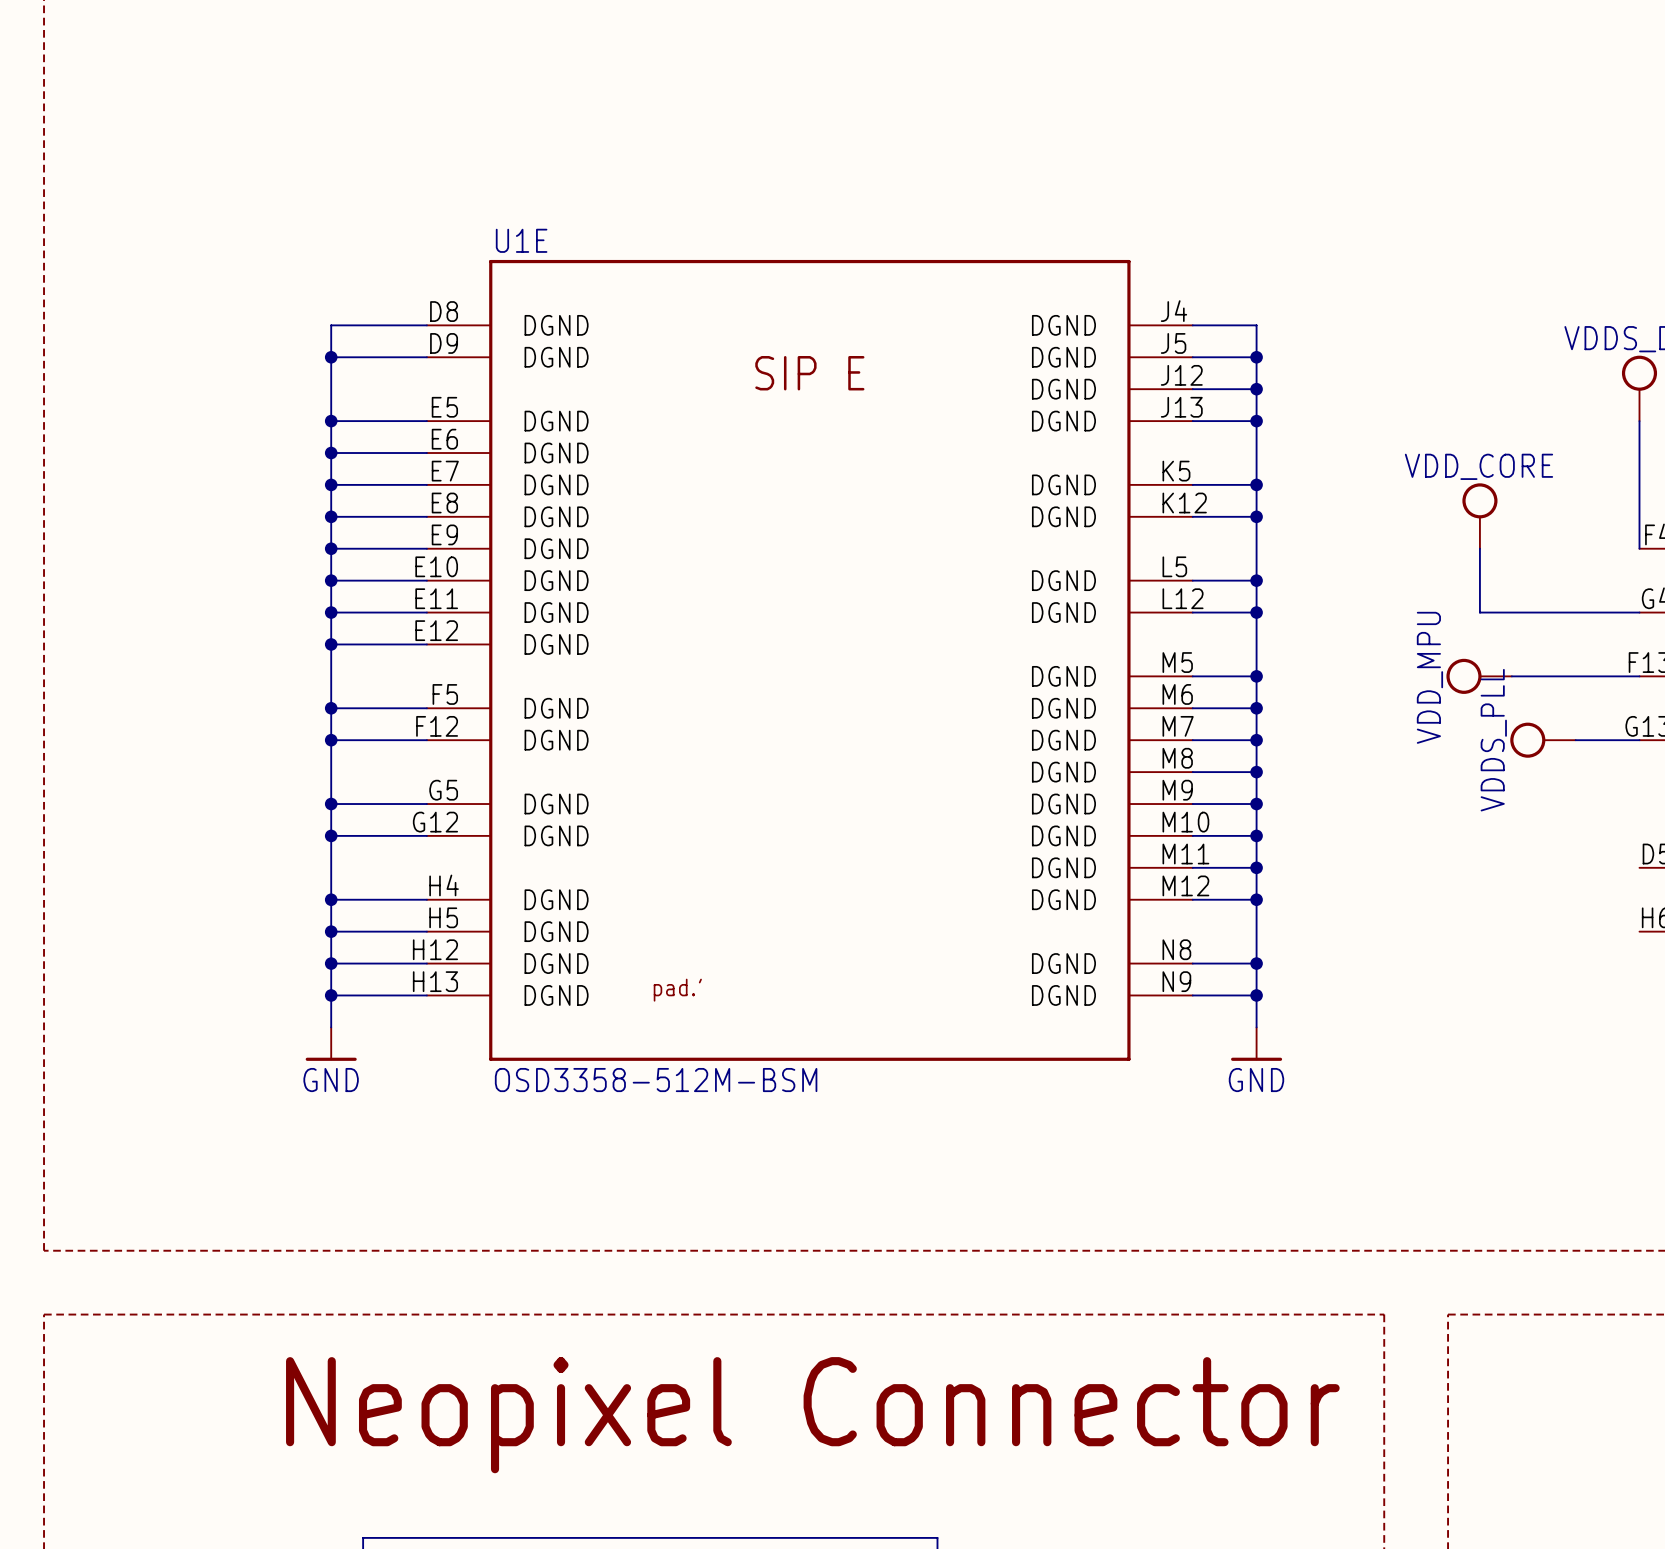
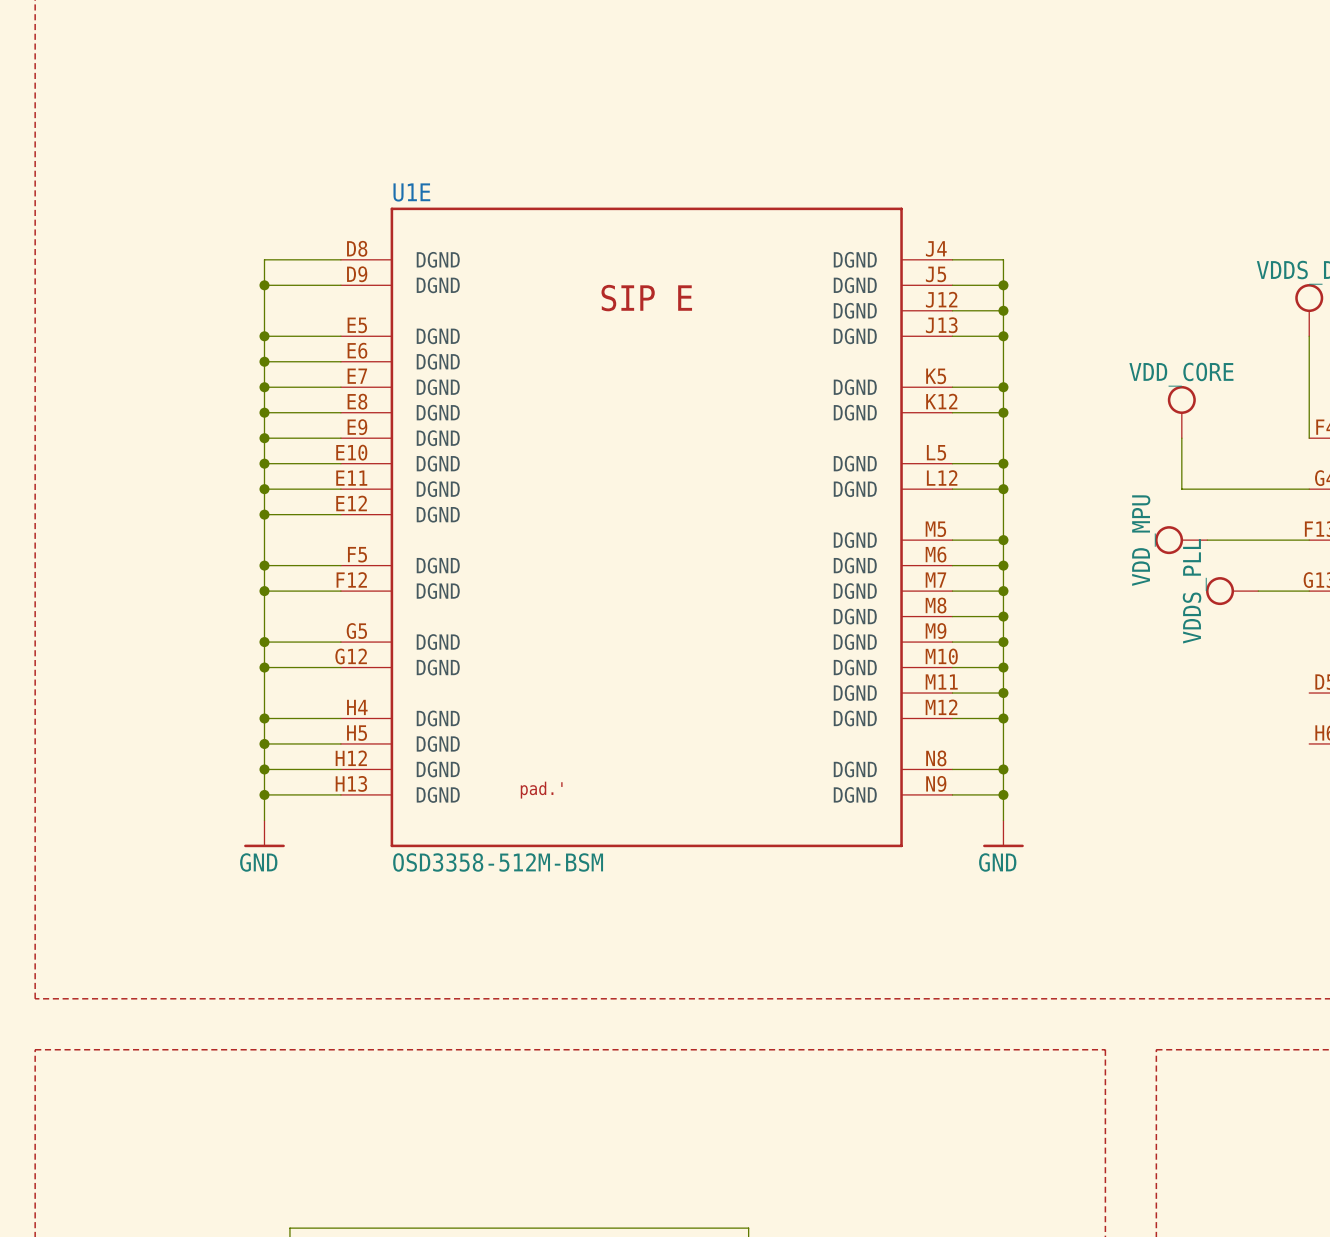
text: Neopixel Connector (812, 1415) -> none

